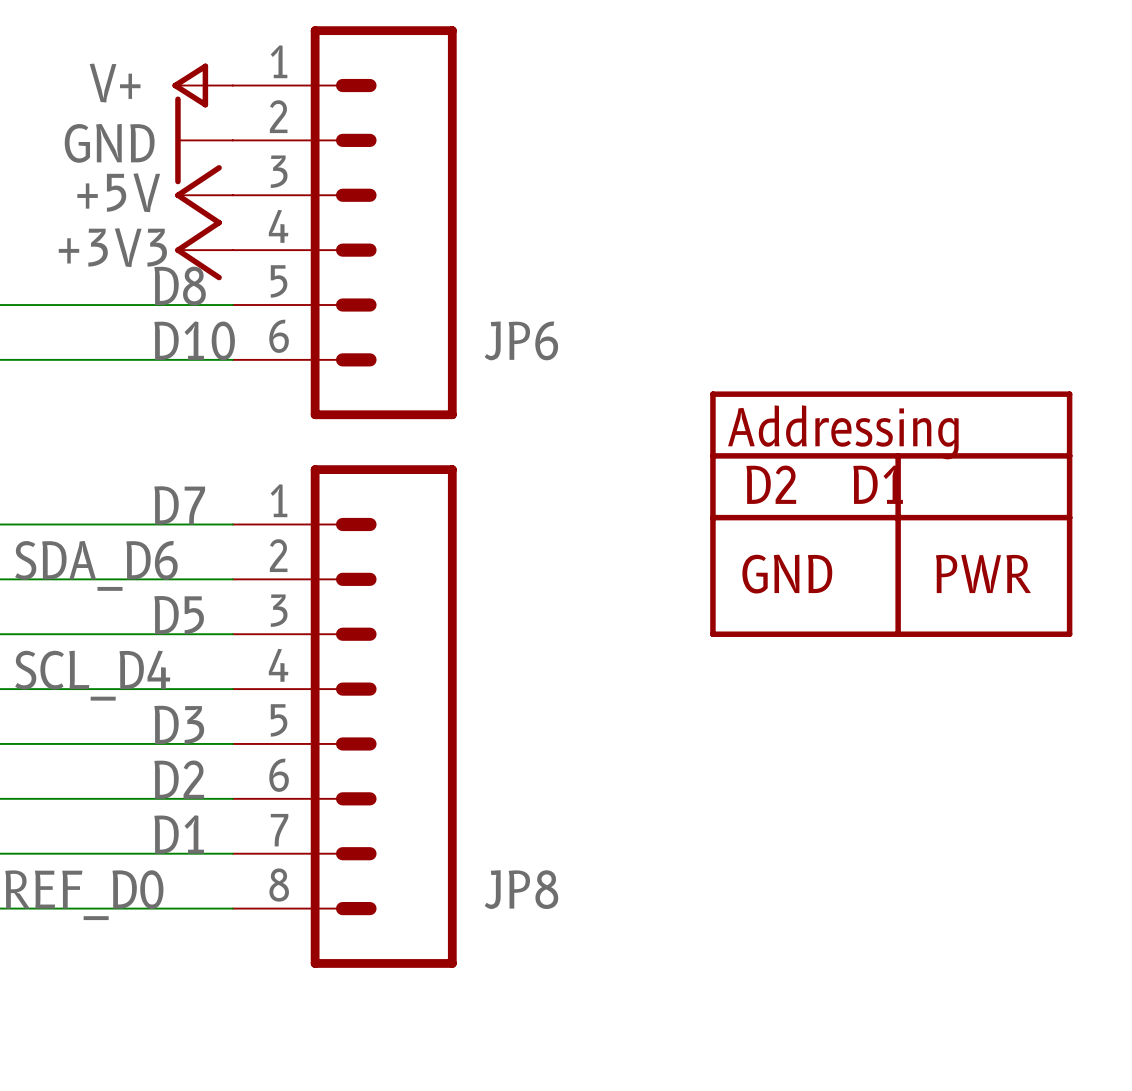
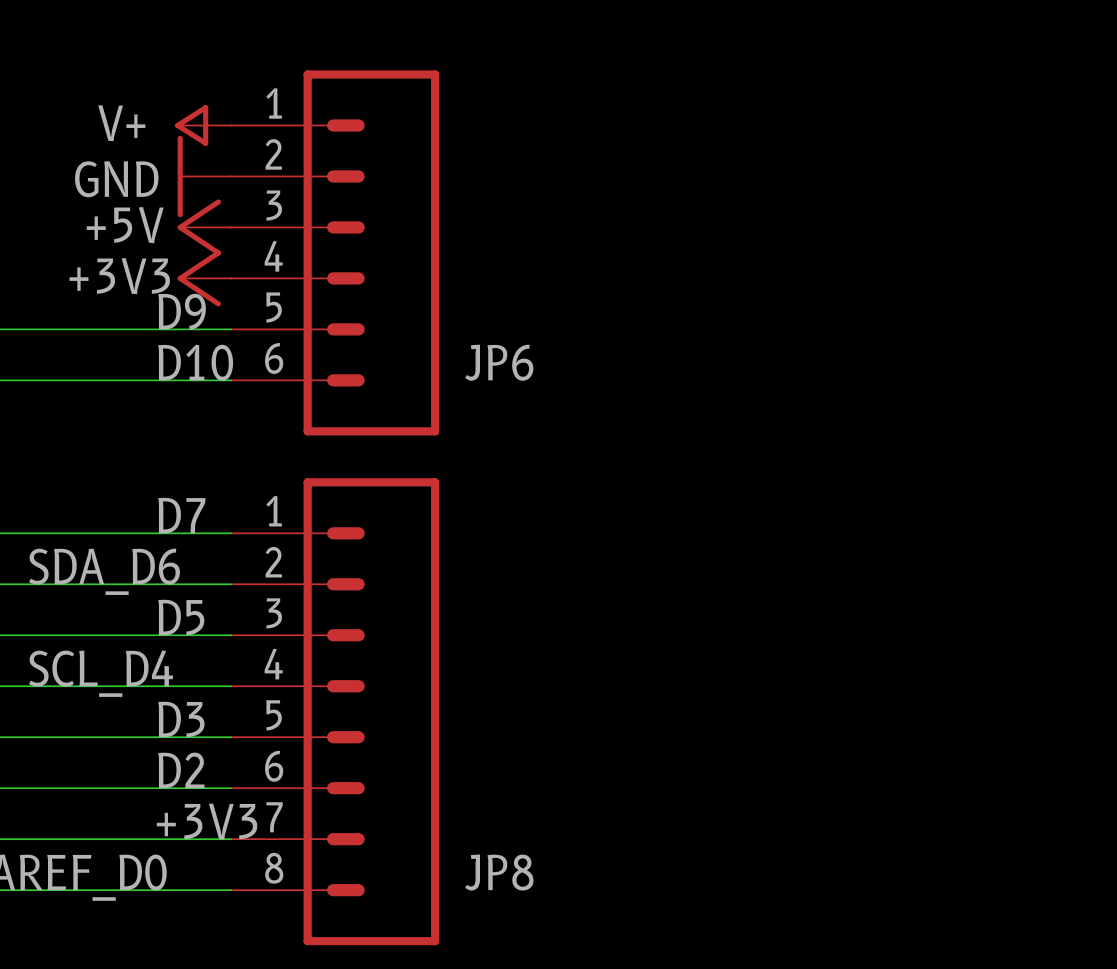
label: D8 (180, 286) -> D9 (182, 311)
GND: PWR (891, 514) -> none
label: D1 (179, 834) -> +3V3 (207, 821)

